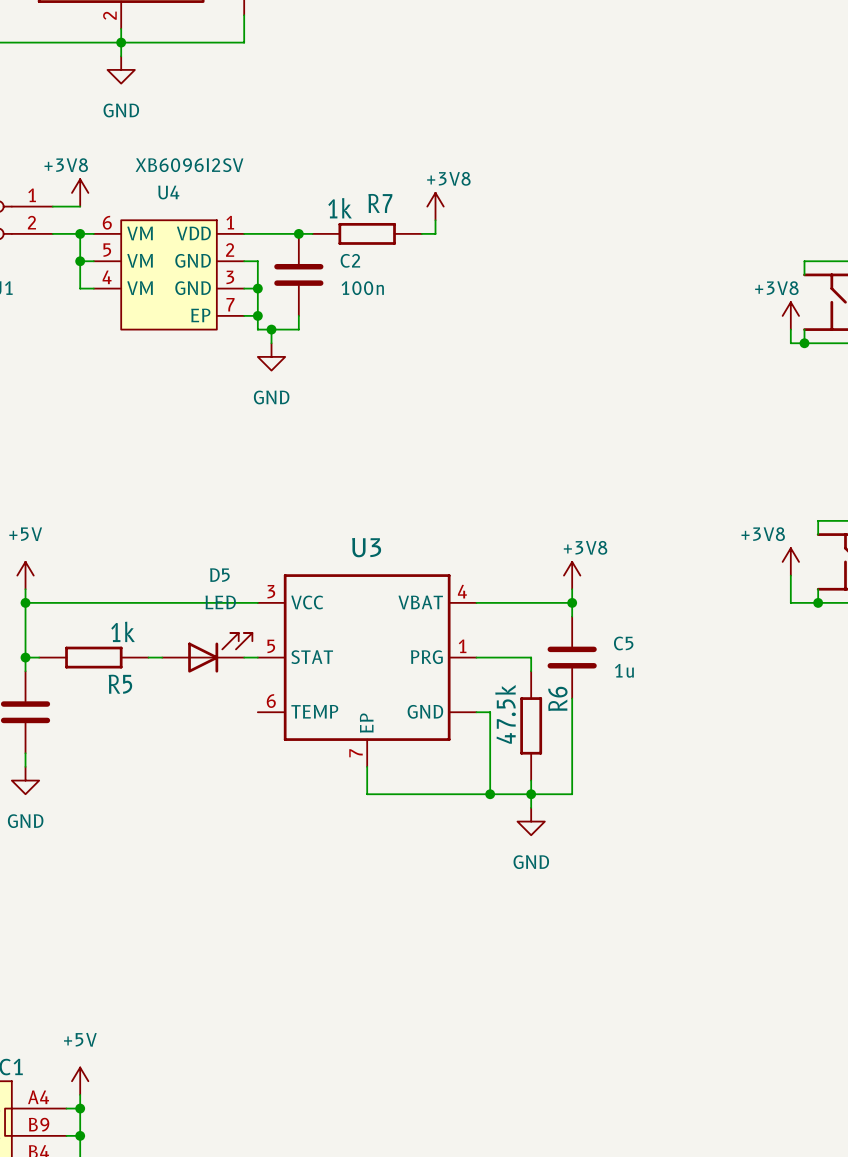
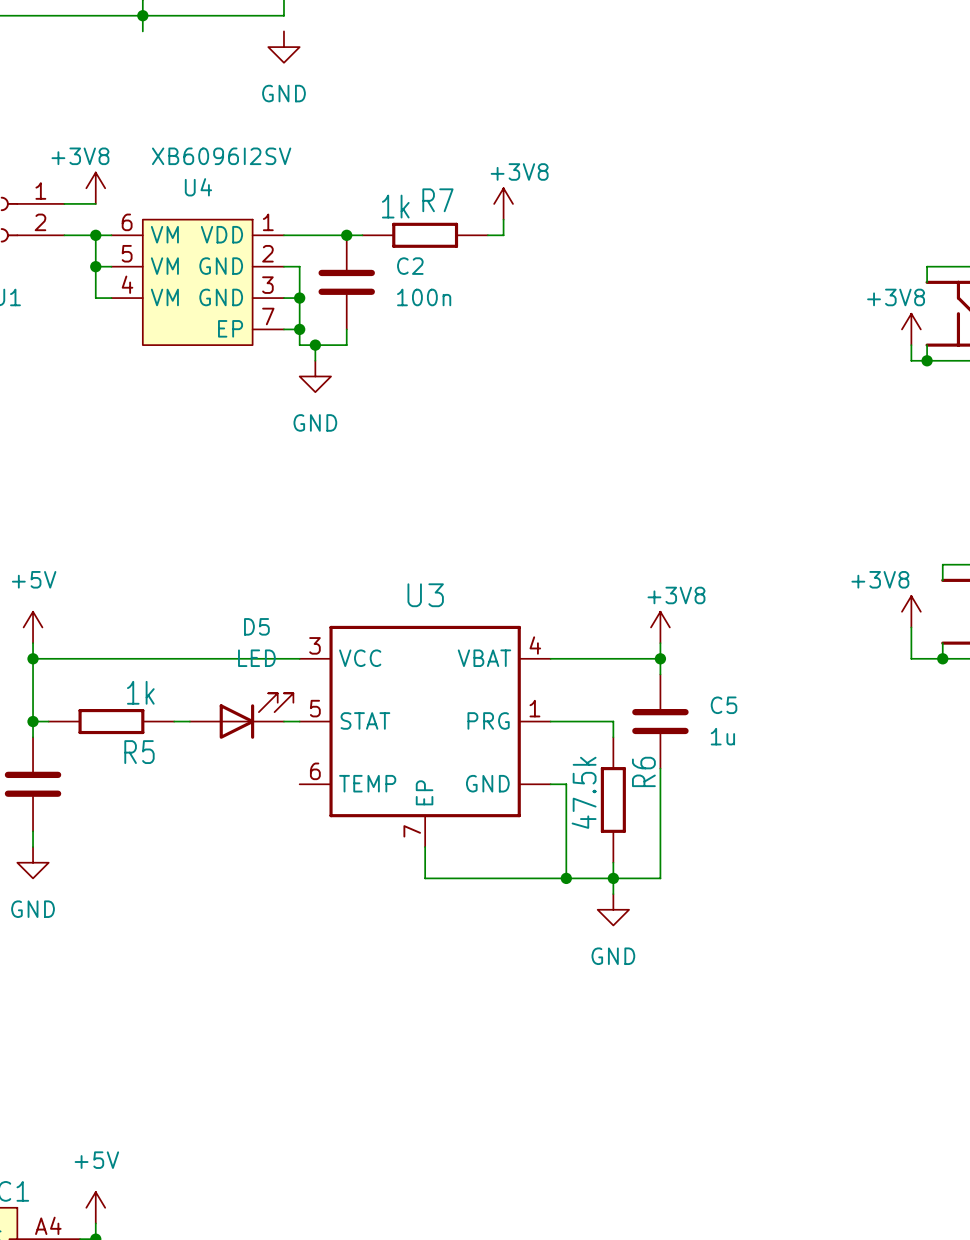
power symbol position: GND (121, 69) -> GND (283, 47)

